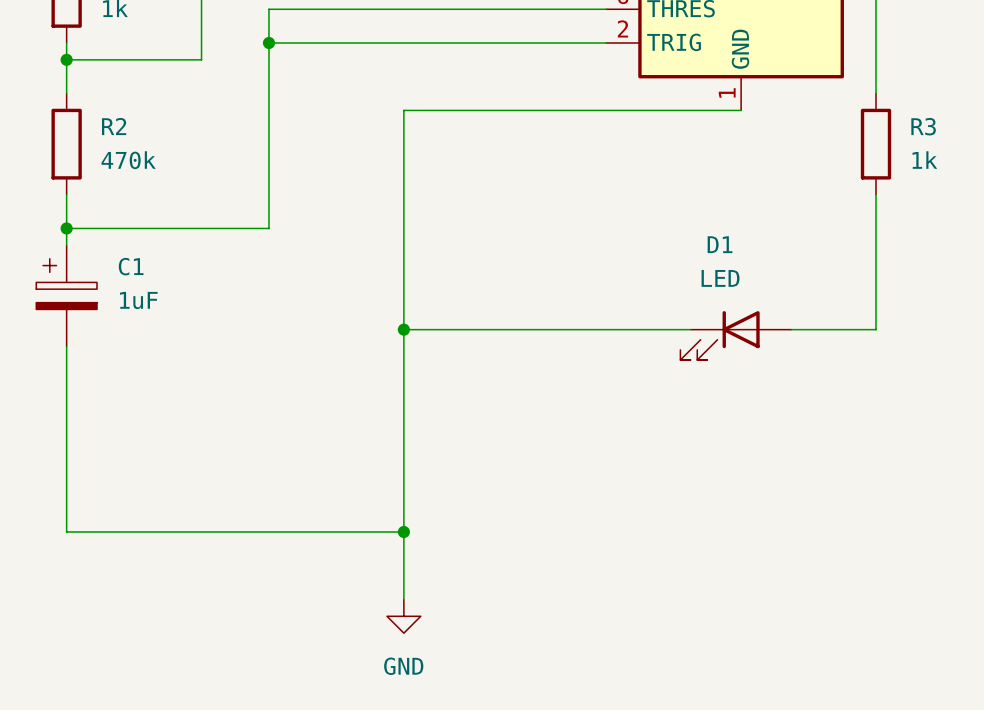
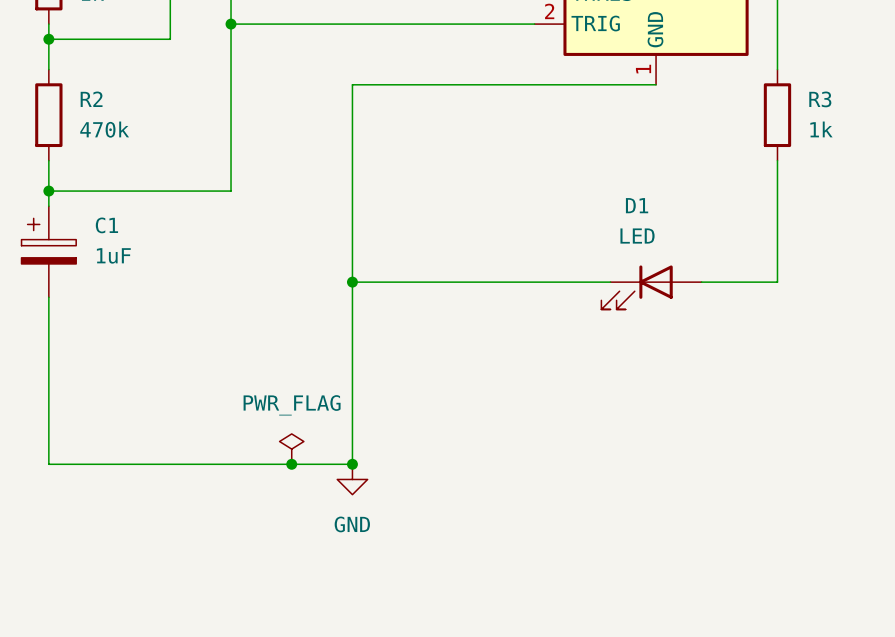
power symbol: none -> PWR_FLAG (291, 449)
junction: none -> (291, 464)
wire: (403, 531) (403, 599) -> none
power symbol position: GND (403, 616) -> GND (352, 479)

